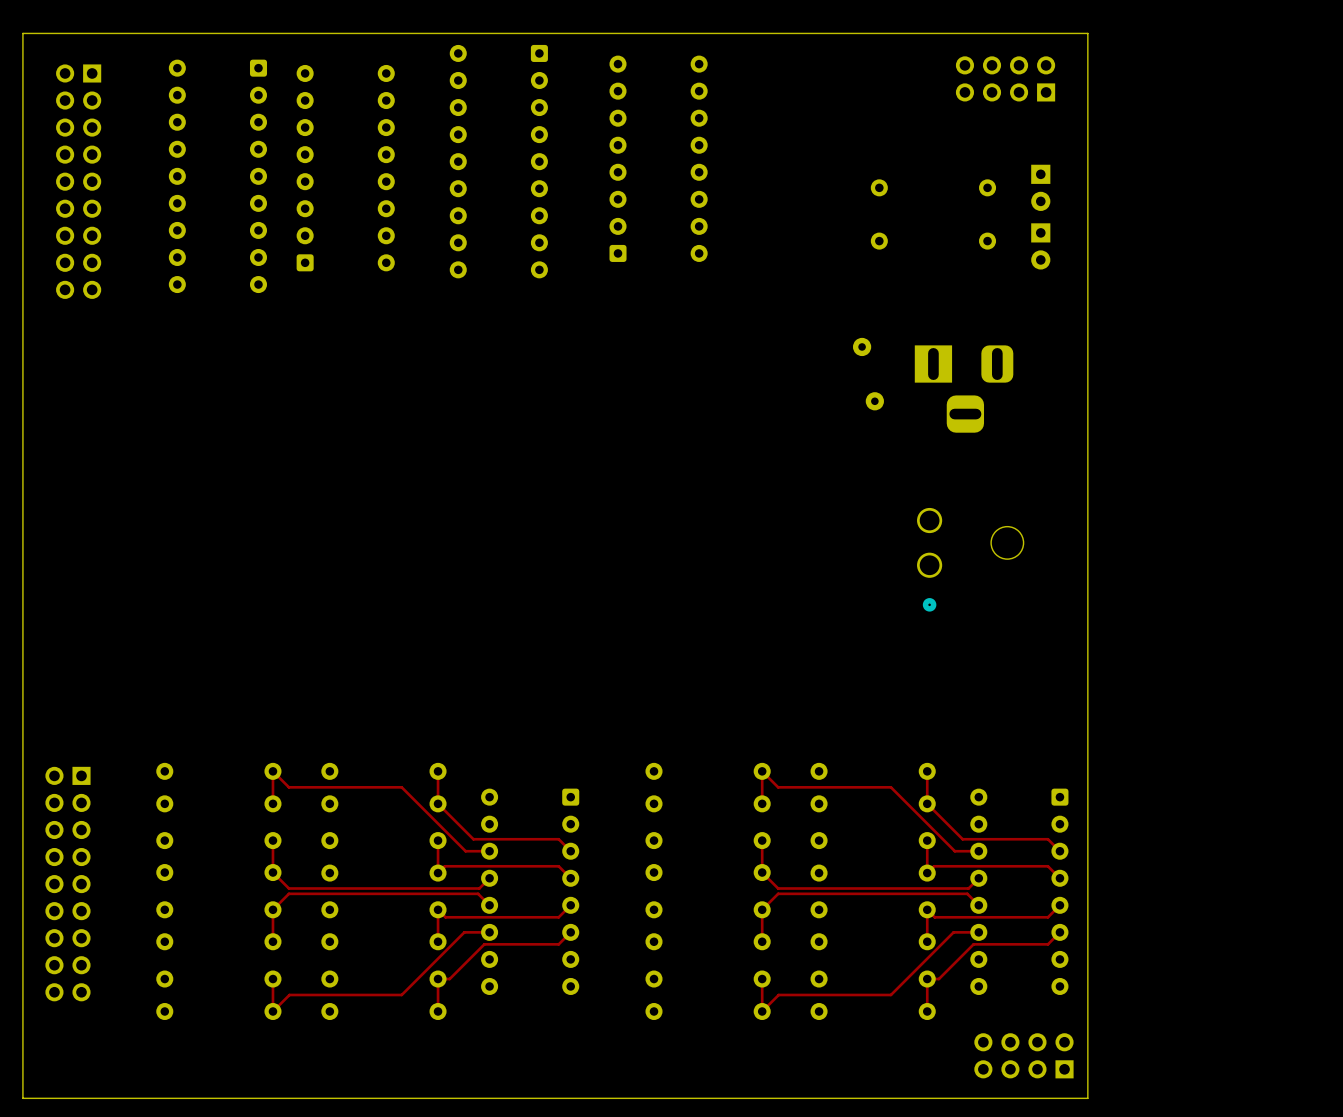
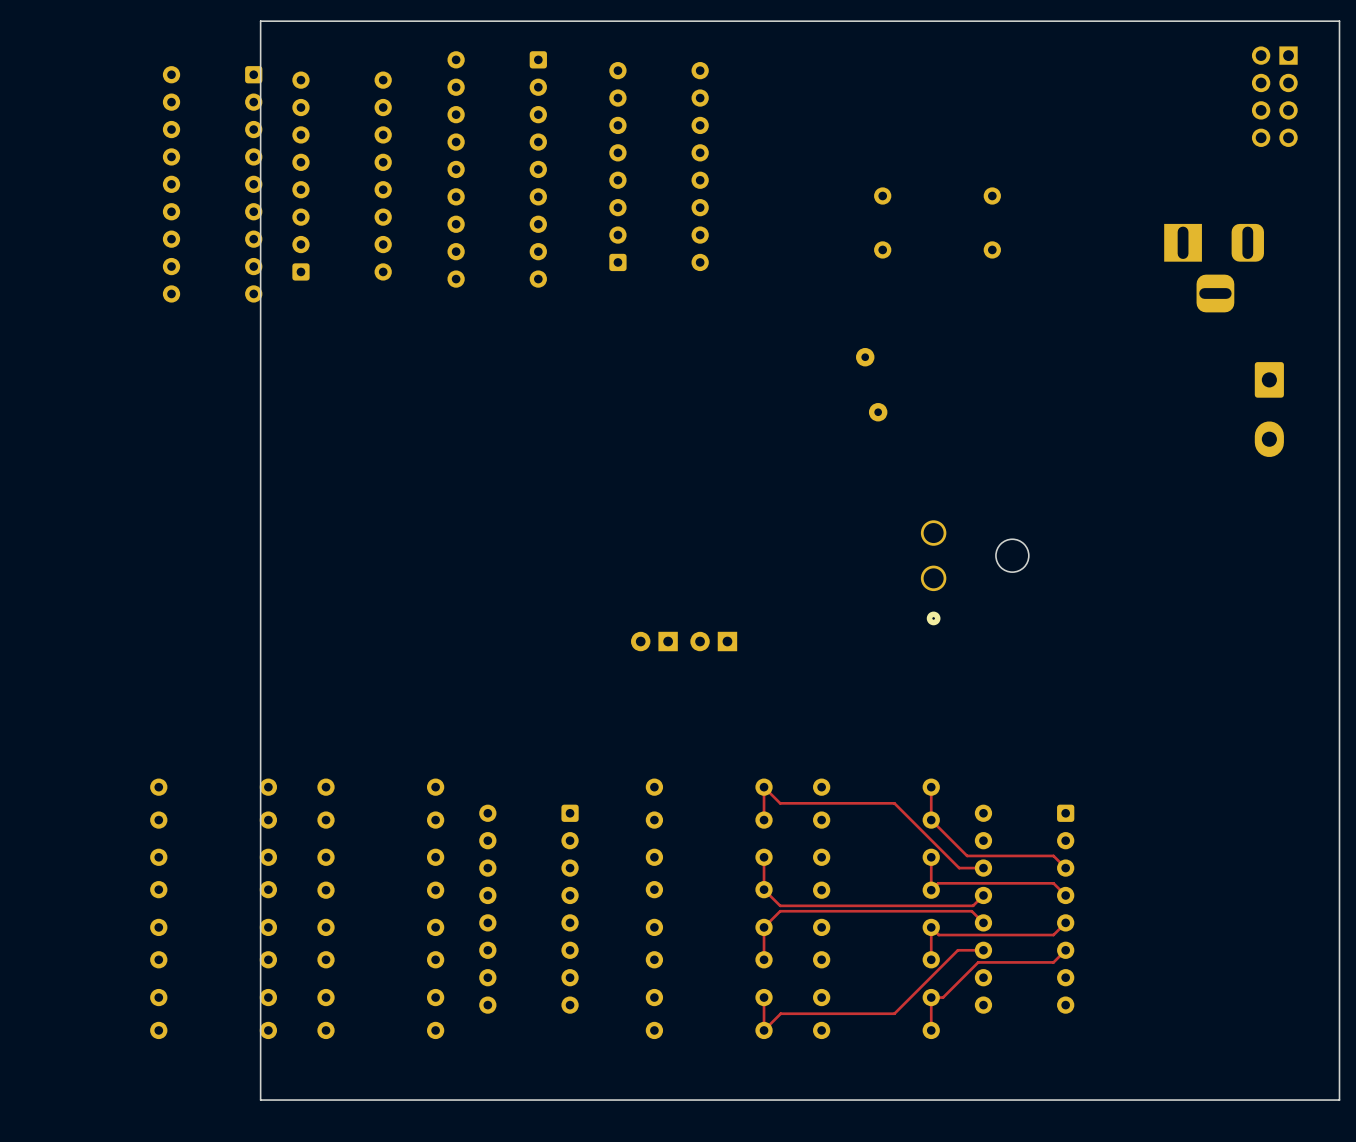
board edge: (1087, 33) (22, 33) (22, 1098) (1087, 1098) (1087, 33) -> (1339, 21) (260, 21) (260, 1100) (1339, 1100) (1339, 21)
part rotation: 0° (1005, 78) -> 90° counterclockwise (1274, 96)
part position: (1005, 78) -> (1274, 96)
part: (78, 181) -> none
part: (1040, 187) -> none
part: (1040, 246) -> none
part: none -> (1214, 268)
part: (964, 389) -> none
part: none -> (1269, 409)
part: none -> (654, 641)
part: none -> (713, 641)
top track: (438, 771) (438, 803) (473, 839) (558, 839) (570, 851) -> none
top track: (272, 803) (272, 771) (288, 787) (401, 787) (465, 851) (489, 851) -> none
top track: (272, 840) (272, 872) (288, 888) (479, 888) (489, 878) -> none
top track: (438, 840) (438, 873) (444, 866) (558, 866) (570, 878) -> none
part: (67, 884) -> none
top track: (489, 905) (478, 893) (288, 893) (272, 909) (272, 941) -> none
top track: (570, 905) (558, 917) (445, 917) (438, 909) (438, 941) -> none
top track: (489, 932) (464, 932) (401, 994) (289, 994) (272, 1011) (272, 979) -> none
top track: (570, 932) (558, 944) (484, 944) (449, 979) (438, 979) (438, 1011) -> none
part: (1023, 1055) -> none

